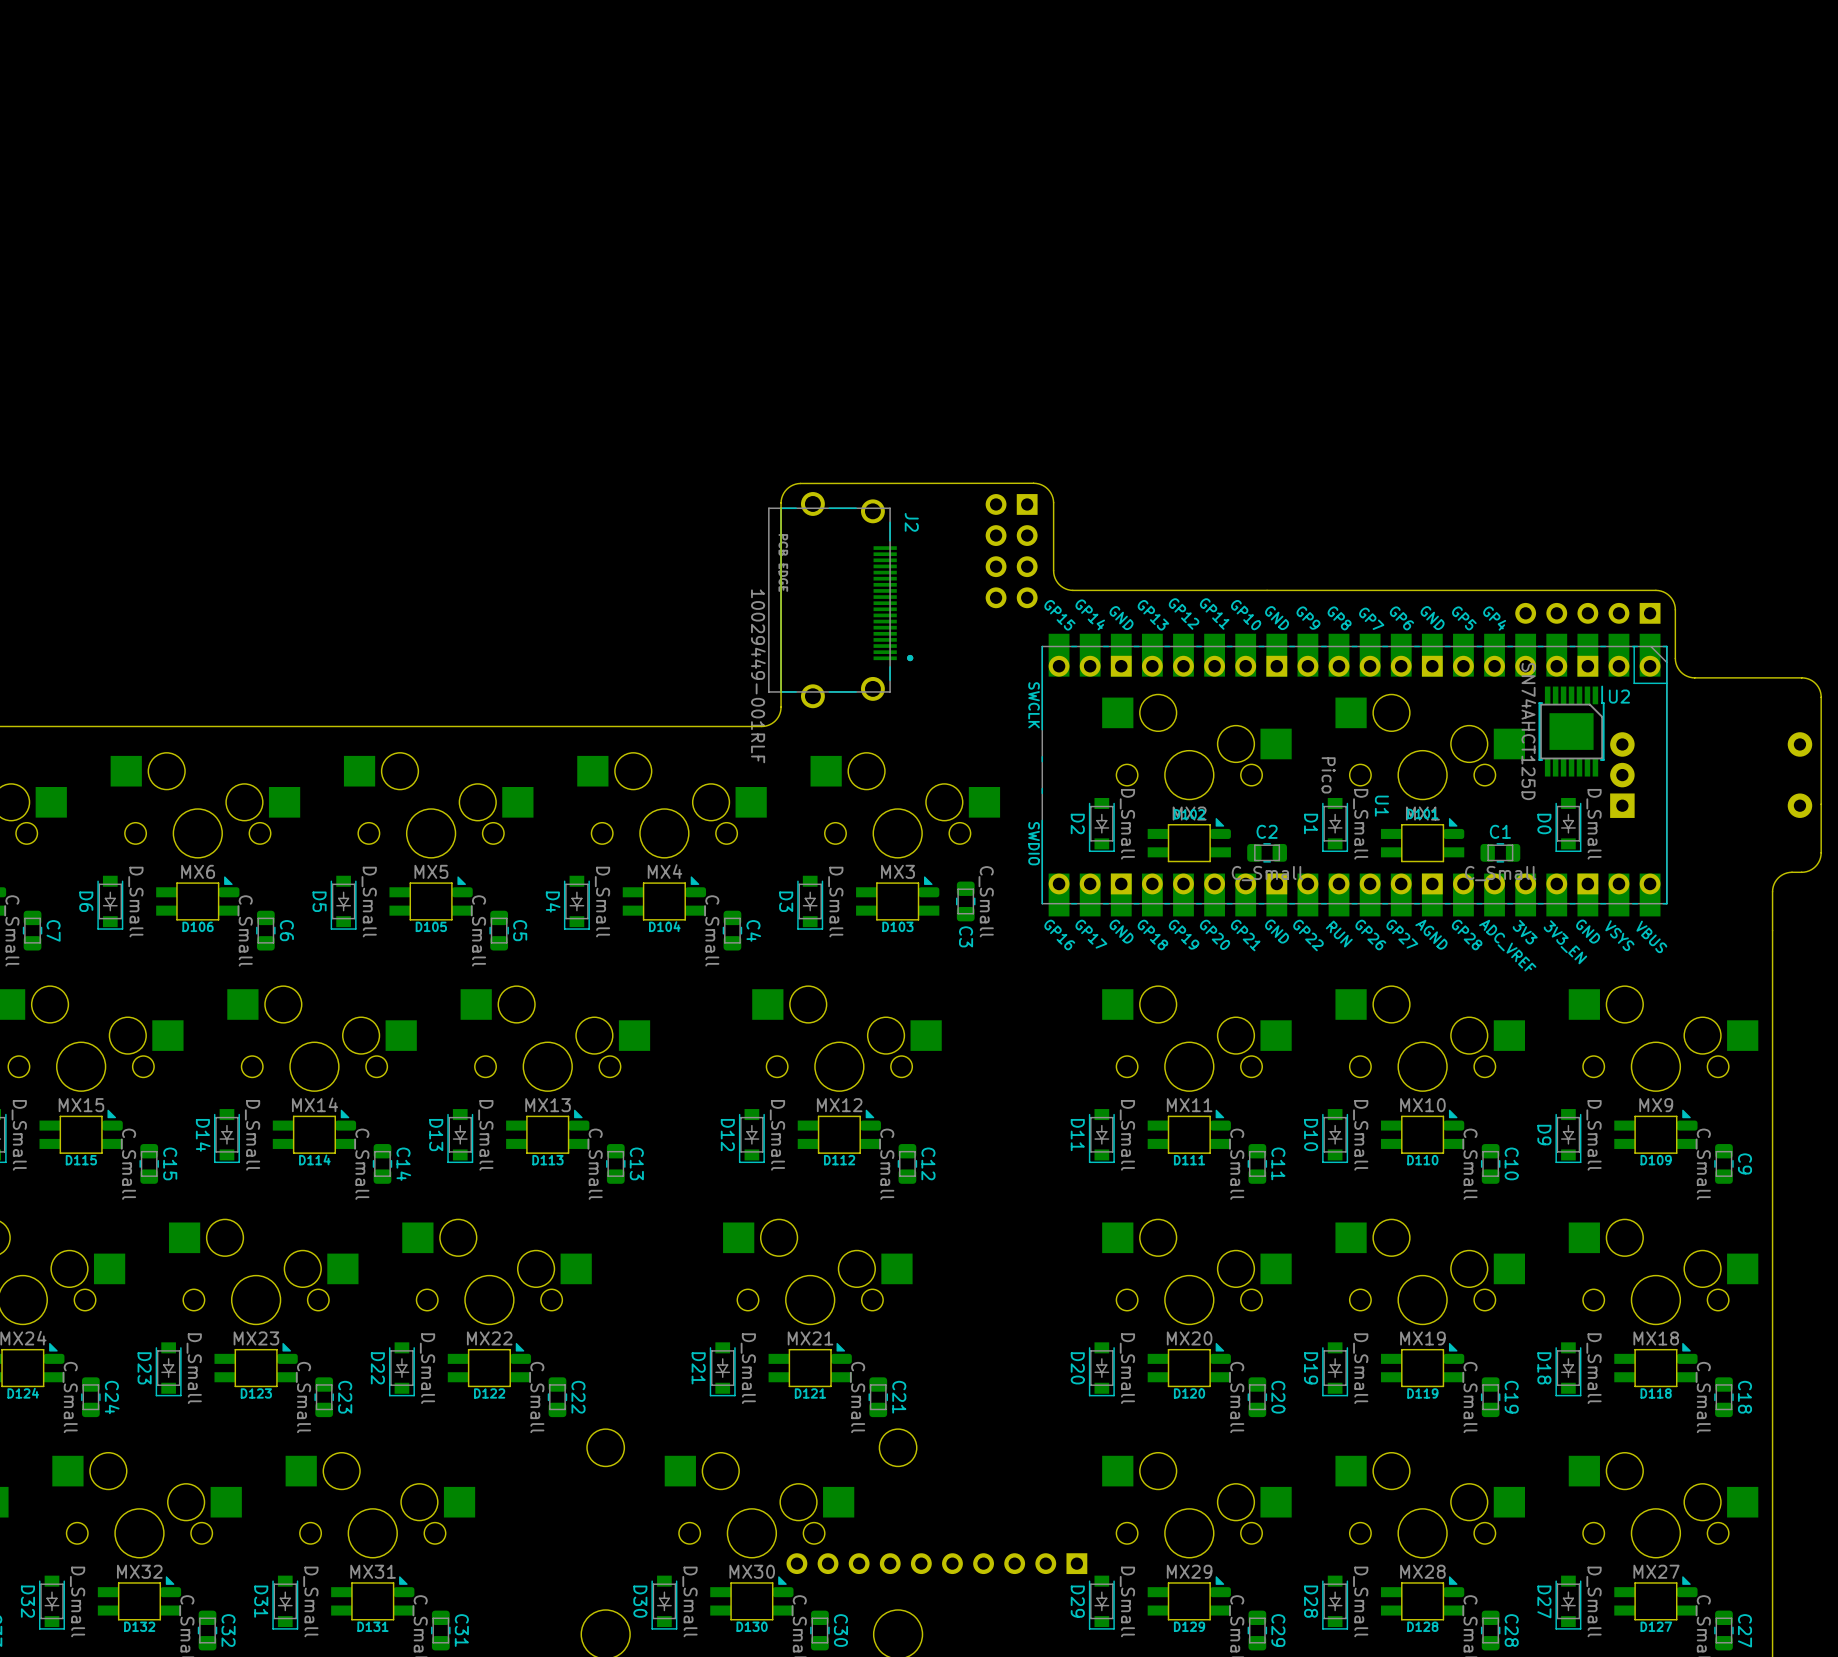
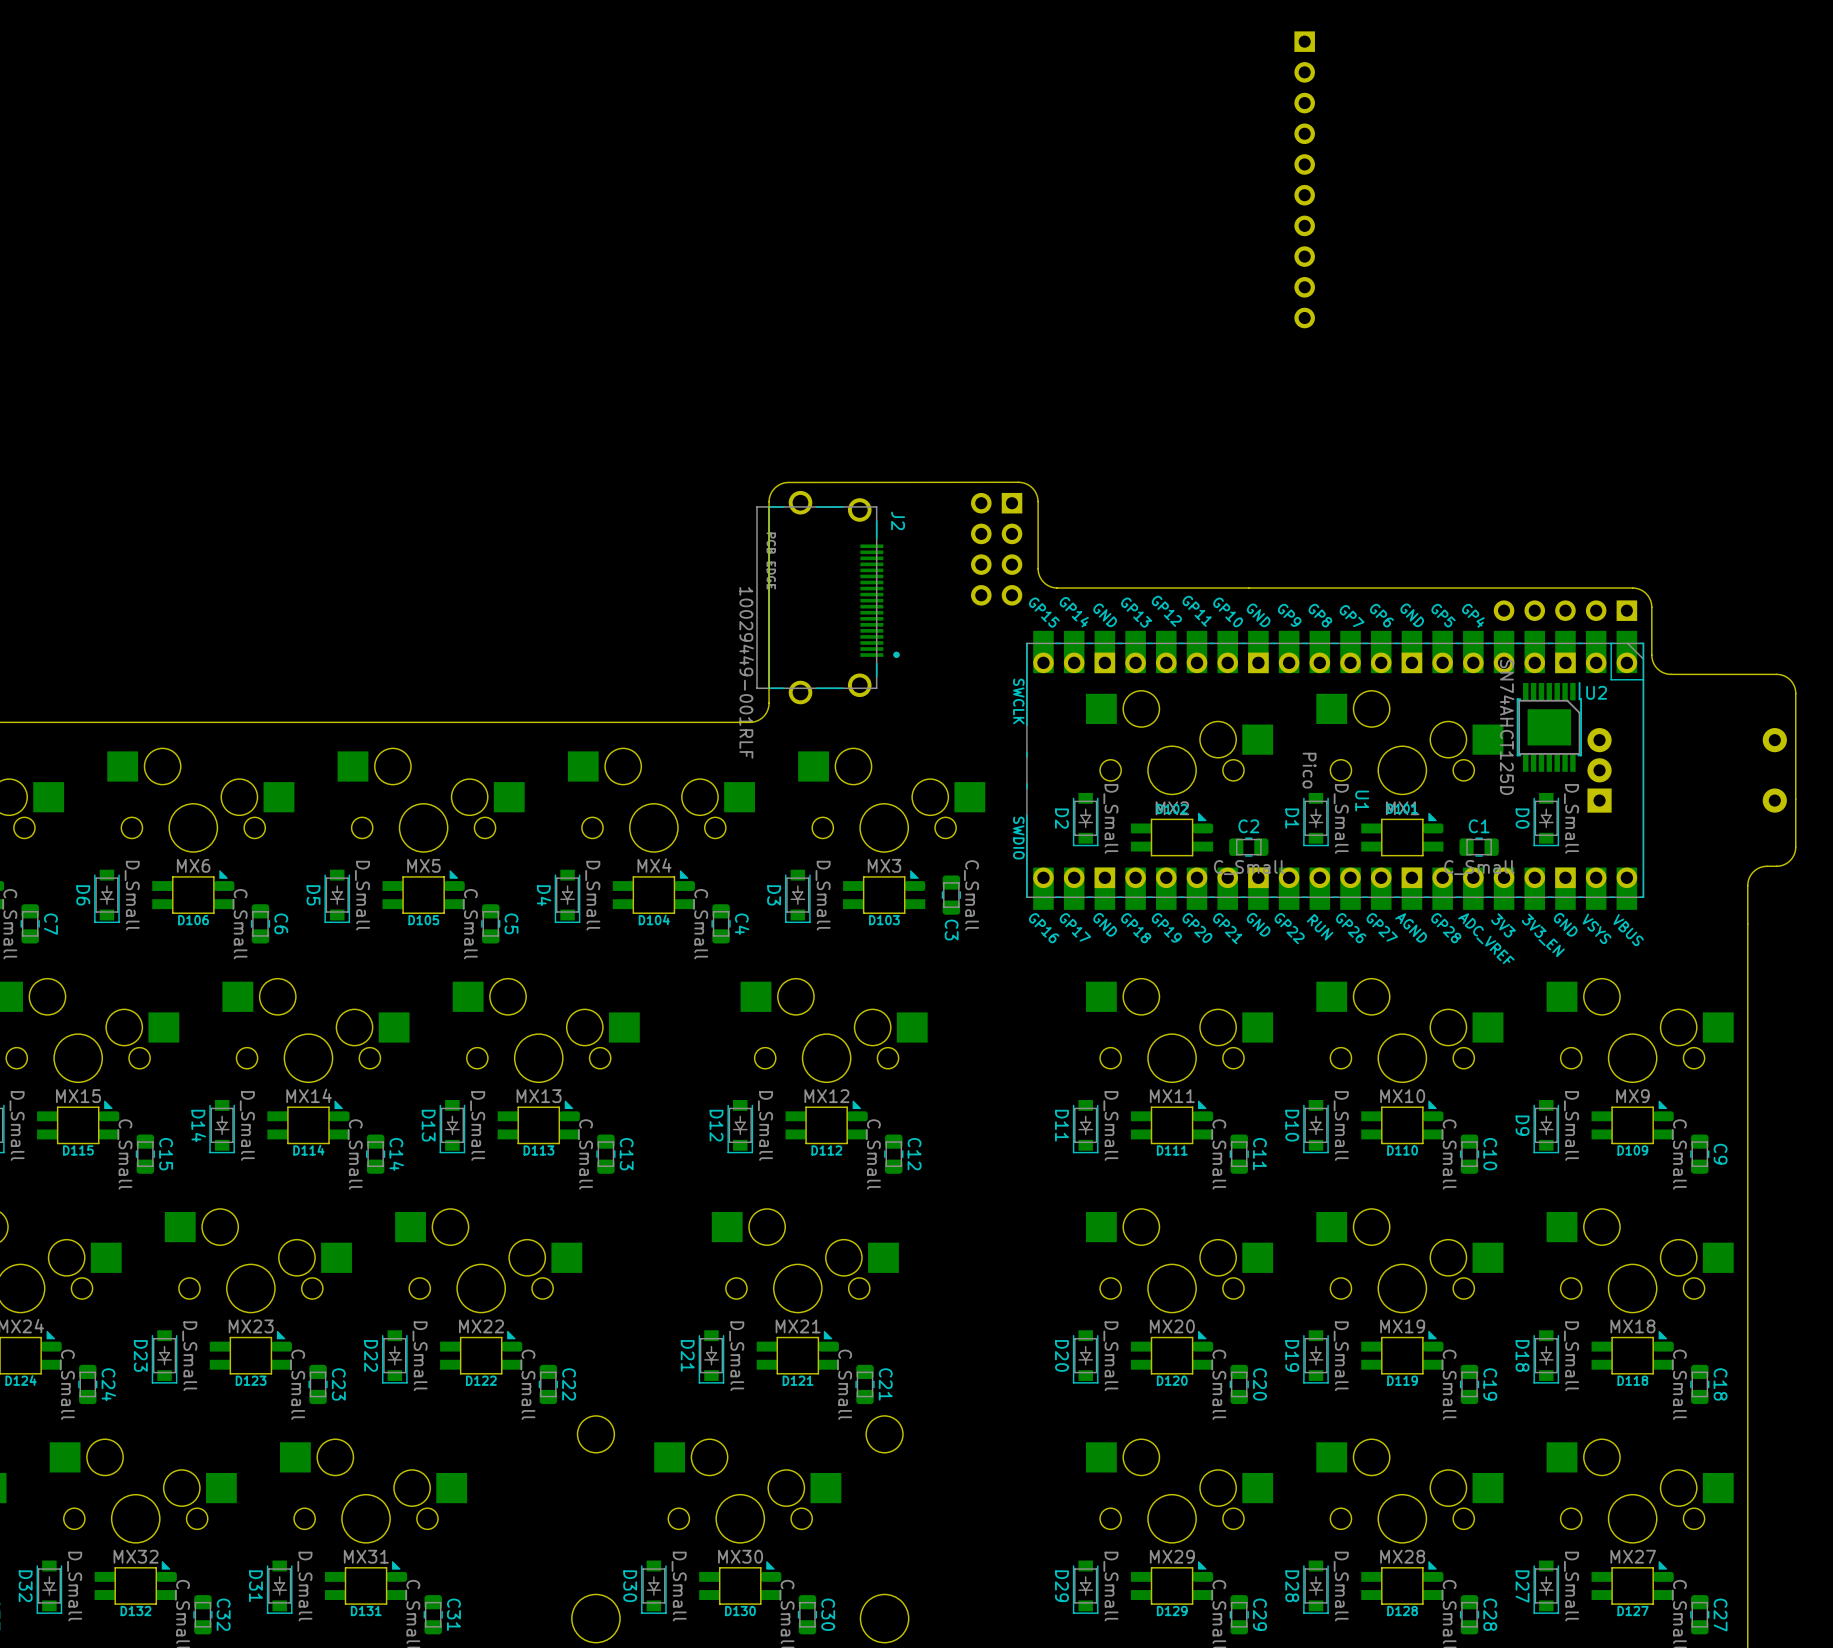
part: none -> (1304, 179)
part: (936, 1563) -> none

